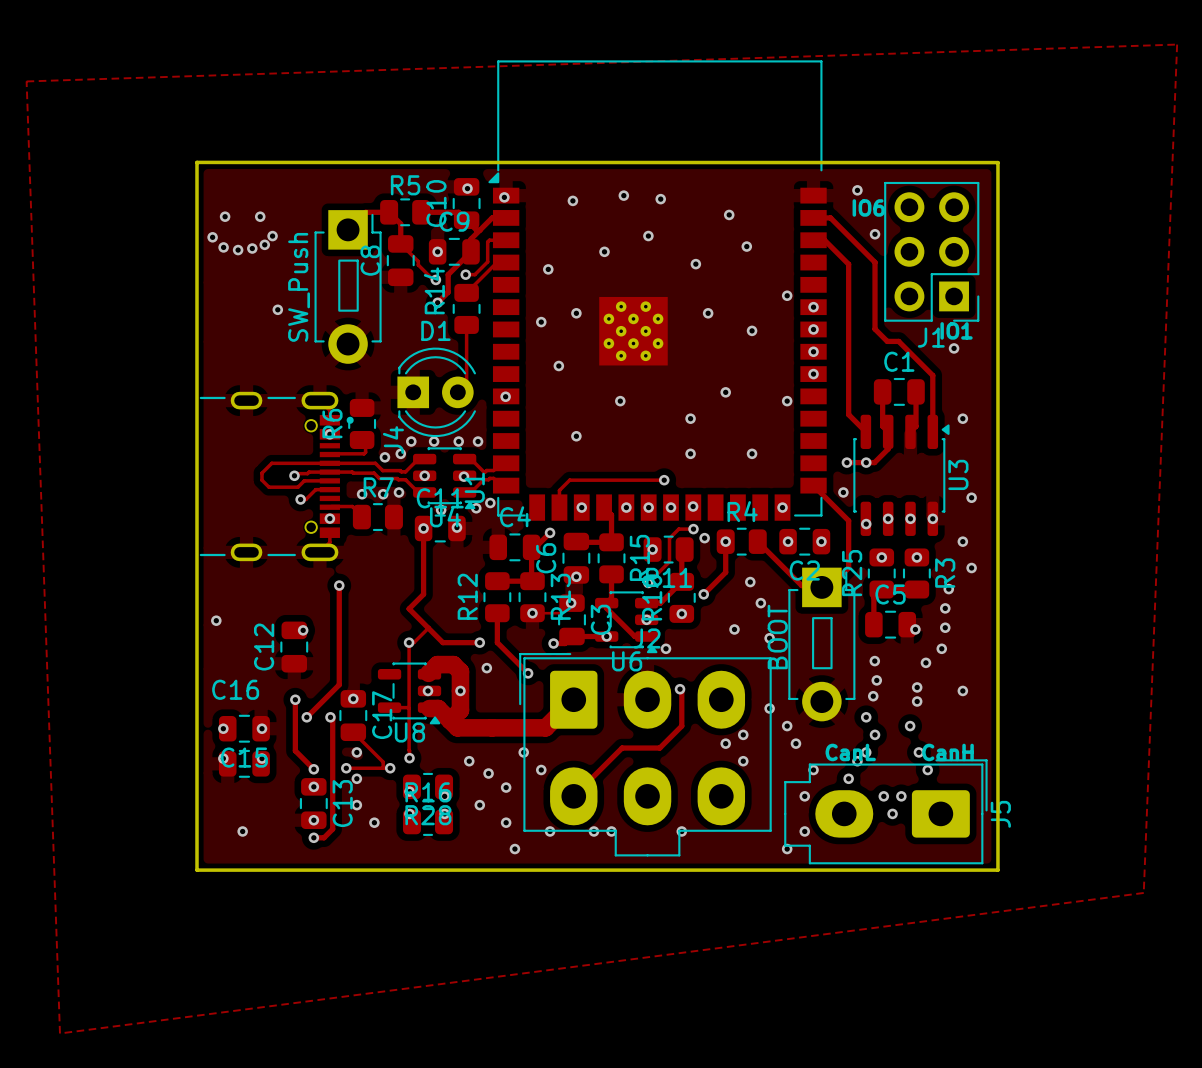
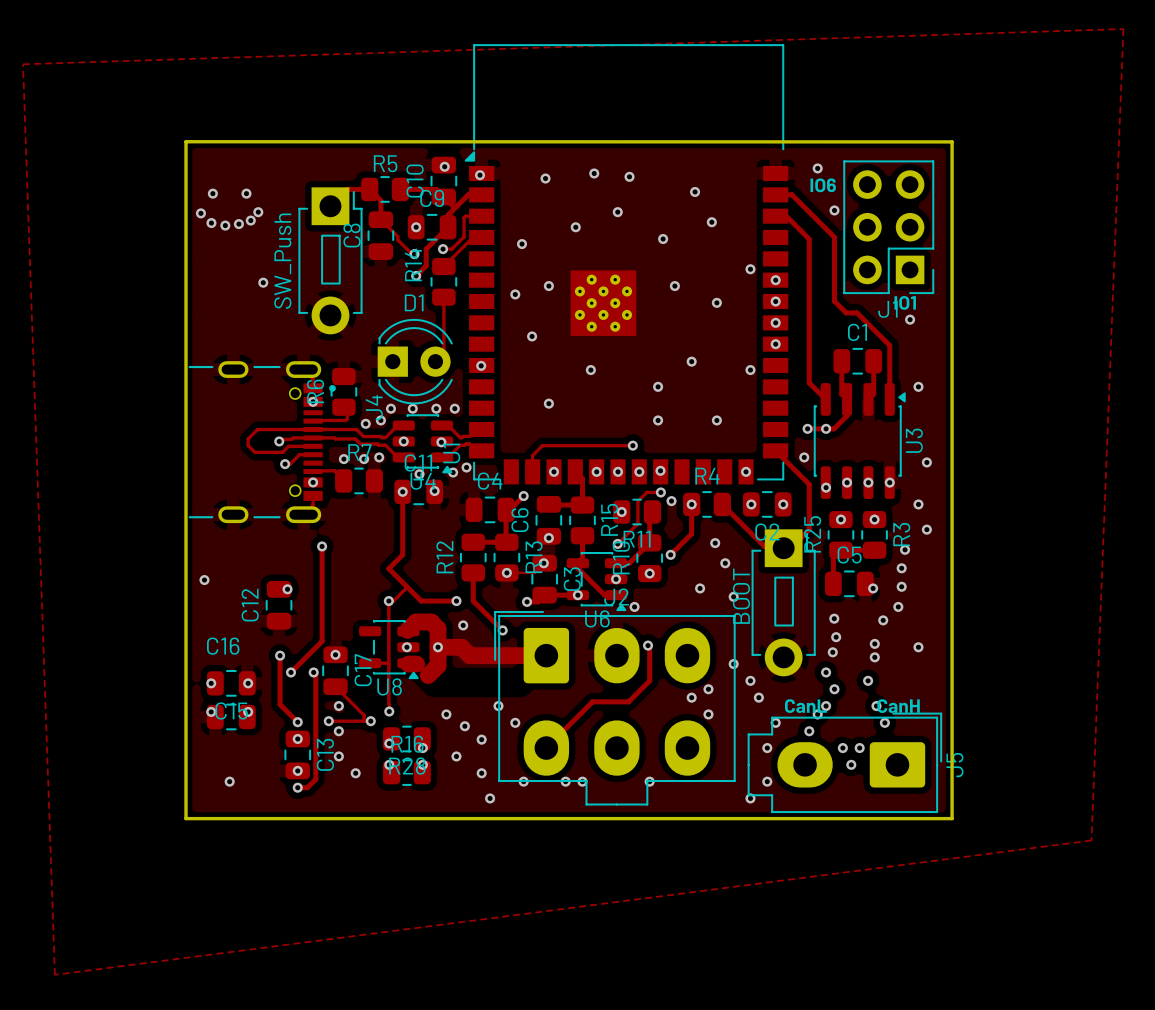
track: (573, 699) (545, 727) (457, 727) (438, 708) -> (546, 655) (469, 655) (461, 647) (438, 647)

